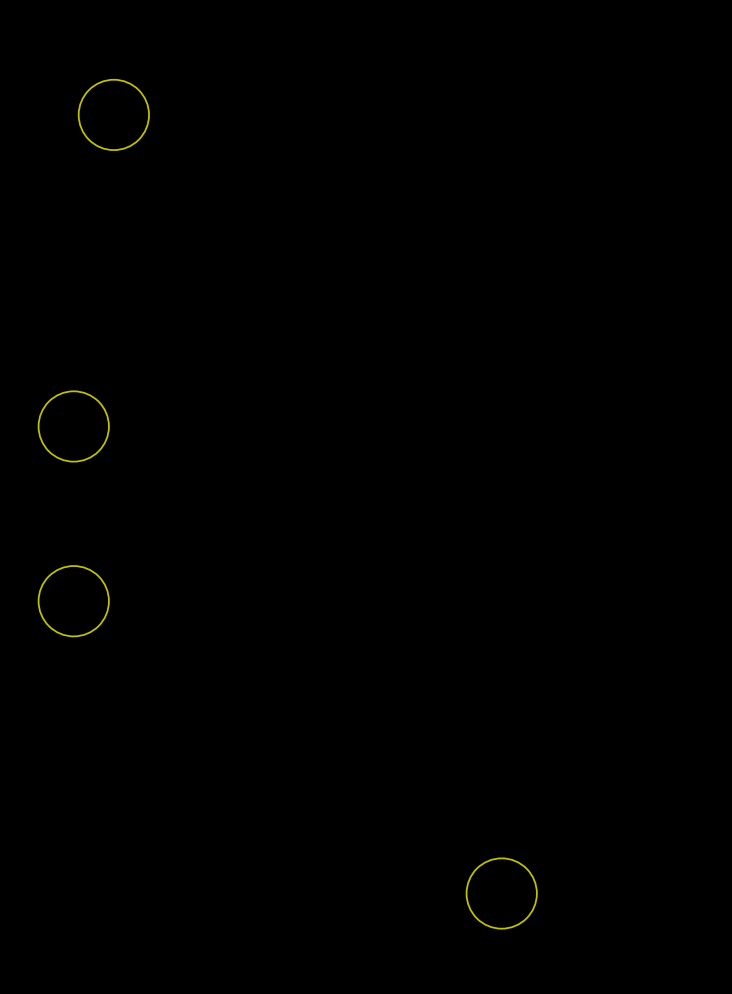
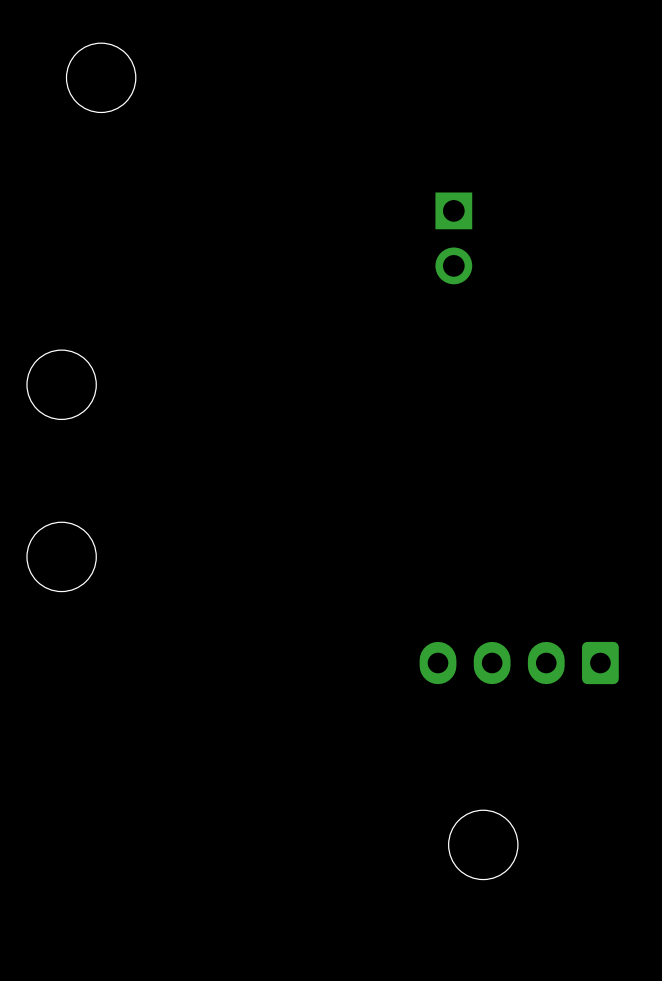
part: none -> (453, 238)
part: none -> (519, 663)

